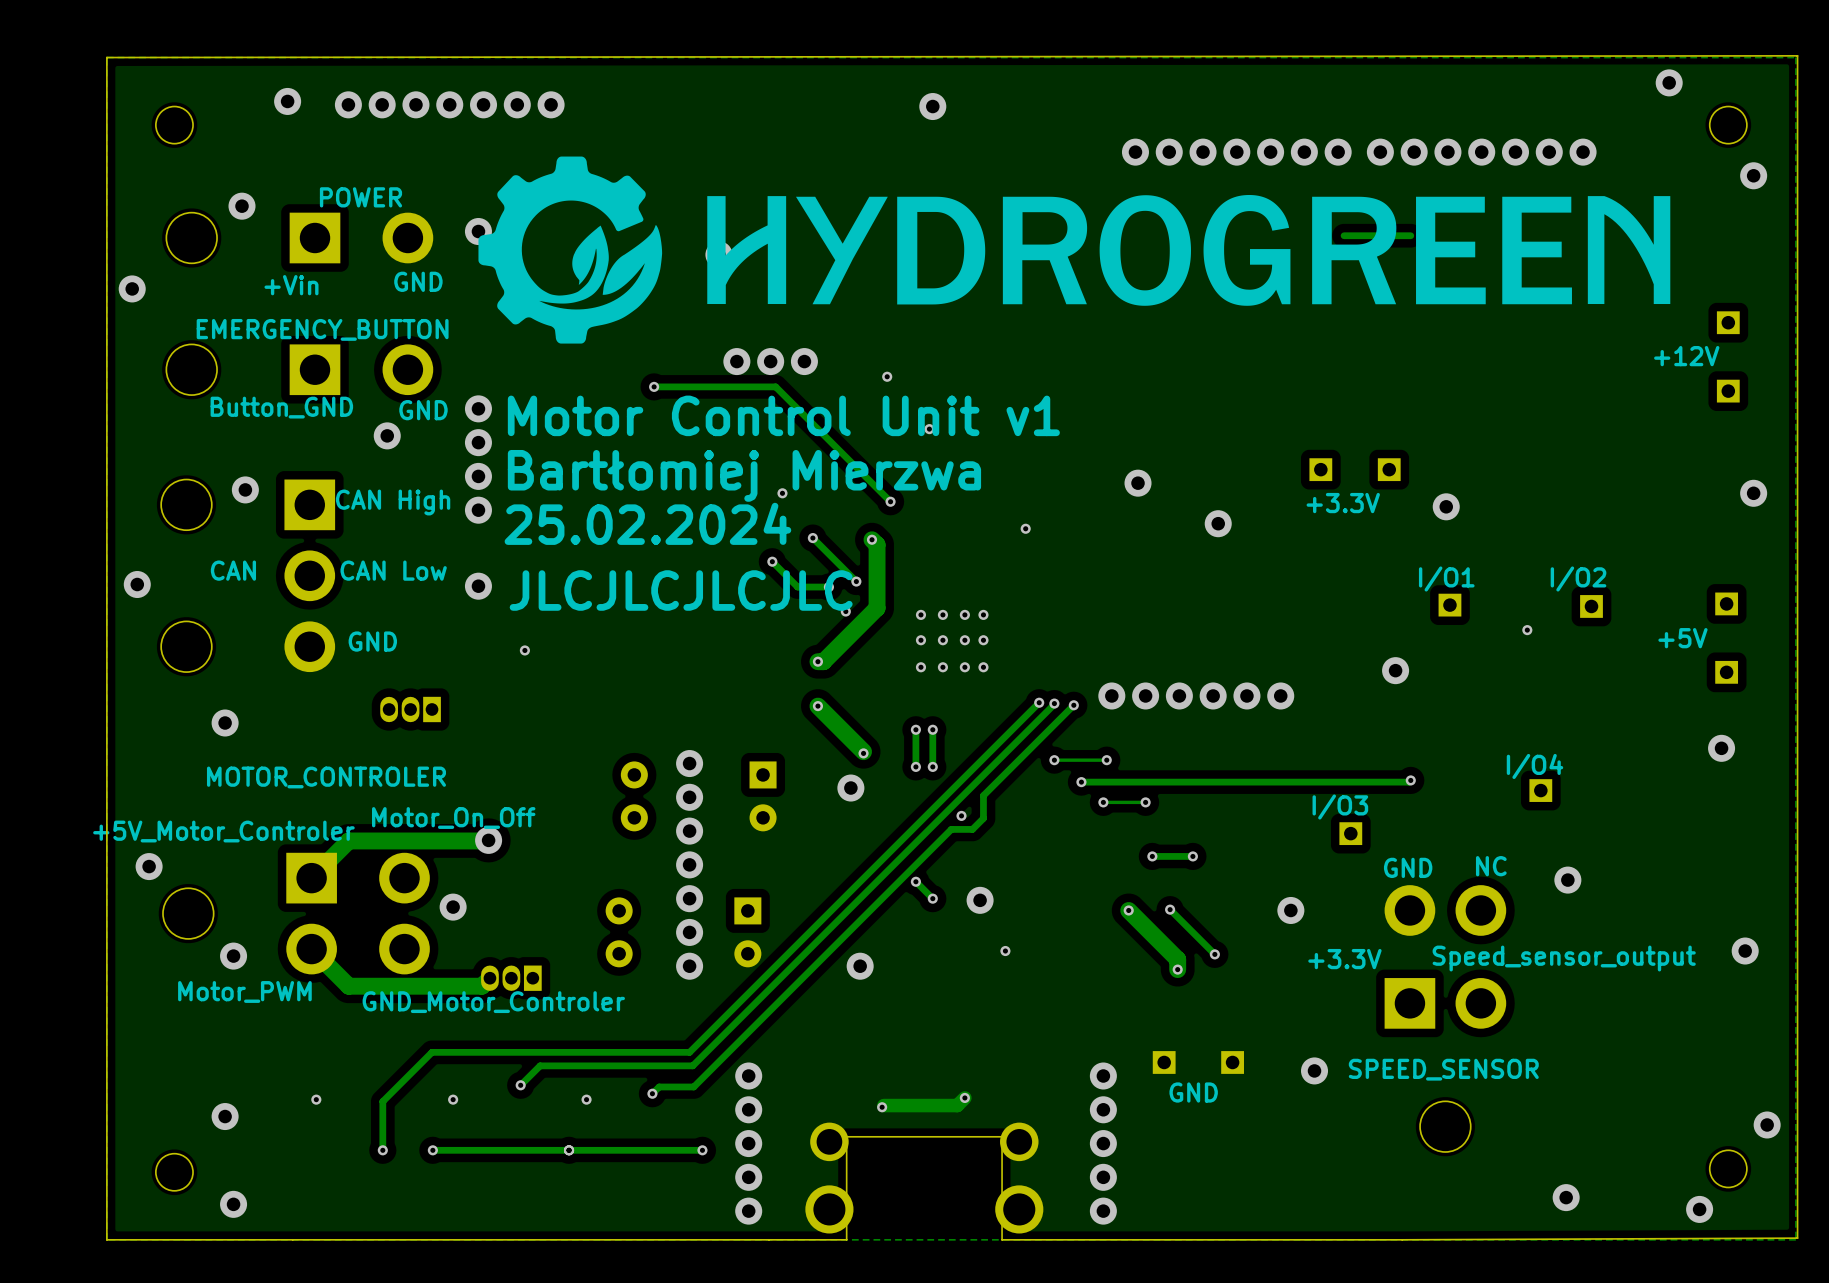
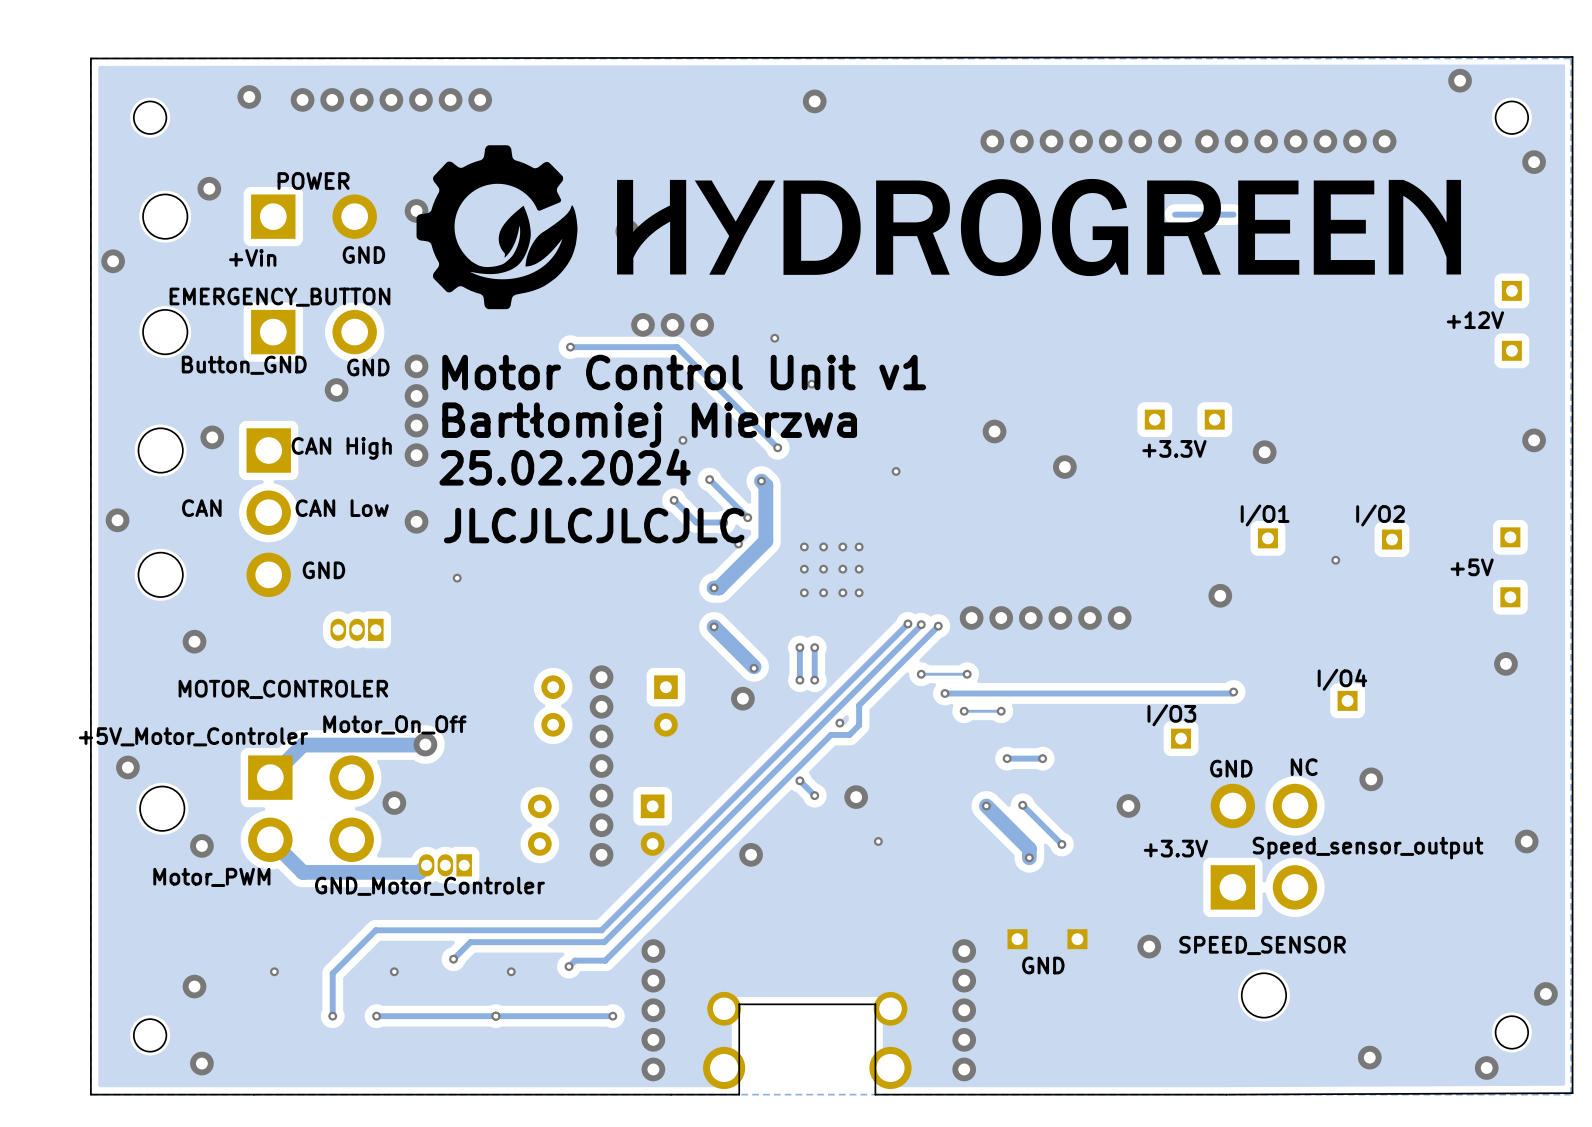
track: (964, 1097) (957, 1105) (883, 1105) (882, 1107) -> none
via: (964, 1097) -> none
via: (882, 1107) -> none

